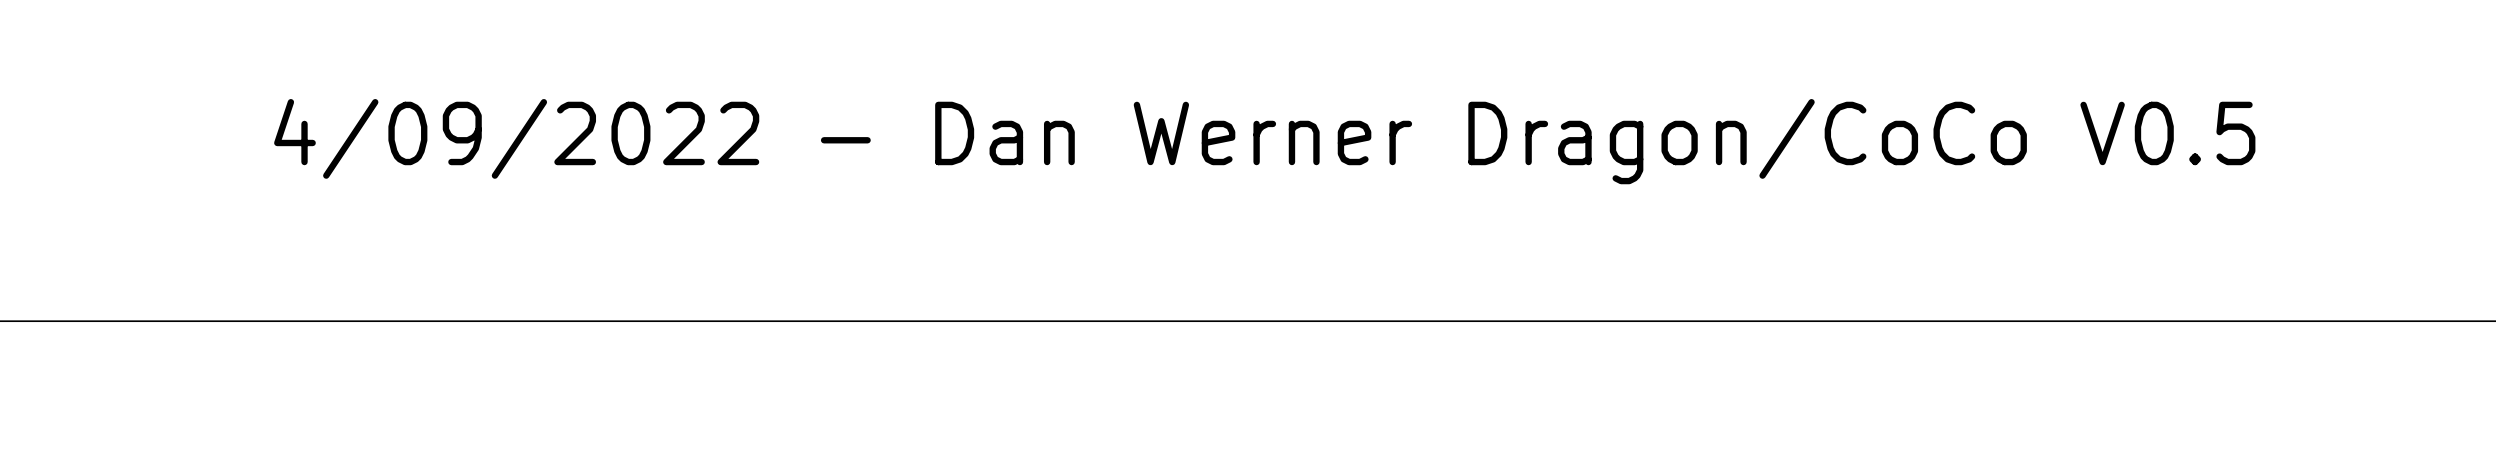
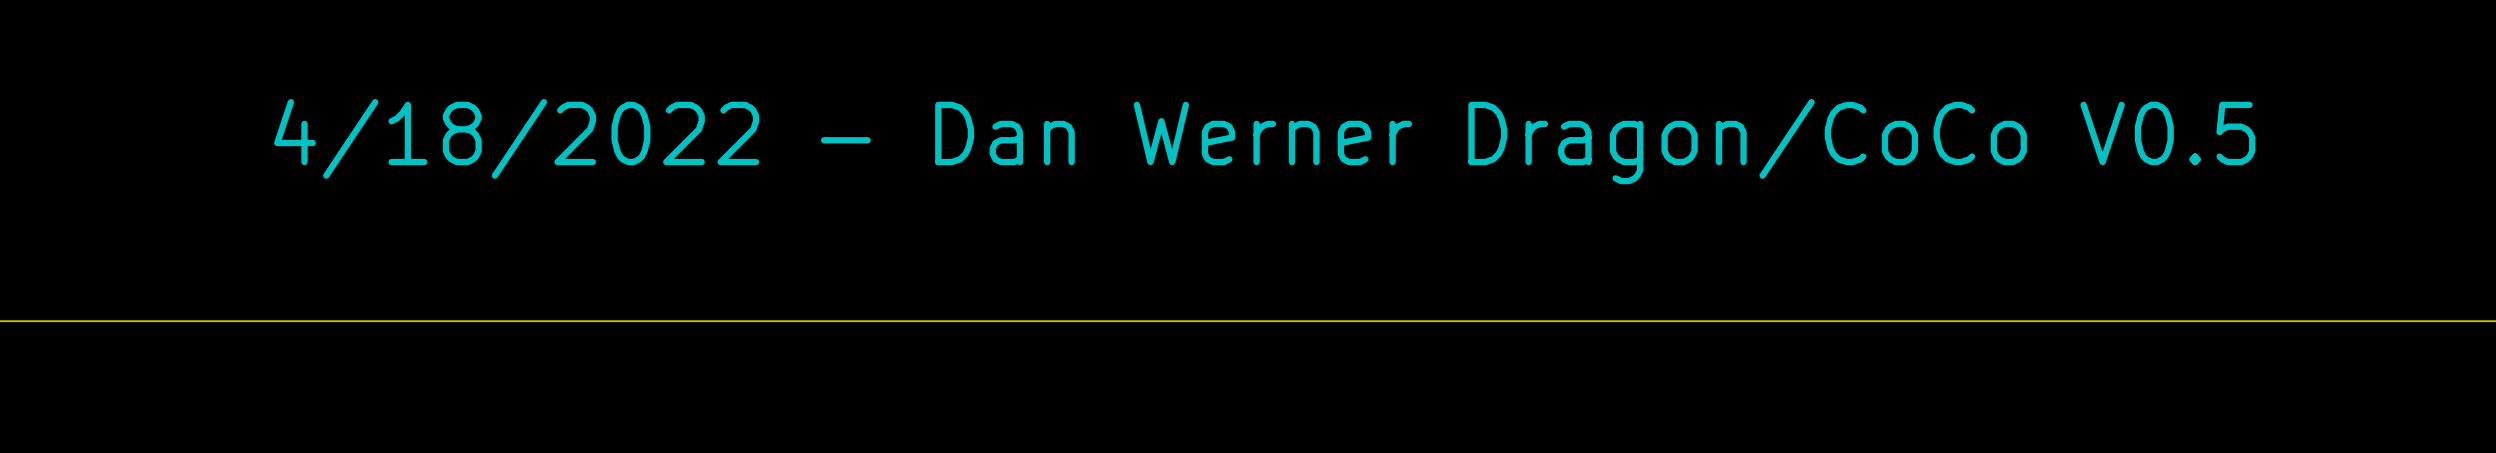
text: 4/09/2022 - Dan Werner Dragon/CoCo V0.5 (1264, 141) -> 4/18/2022 - Dan Werner Dragon/CoCo V0.5 (1264, 141)

